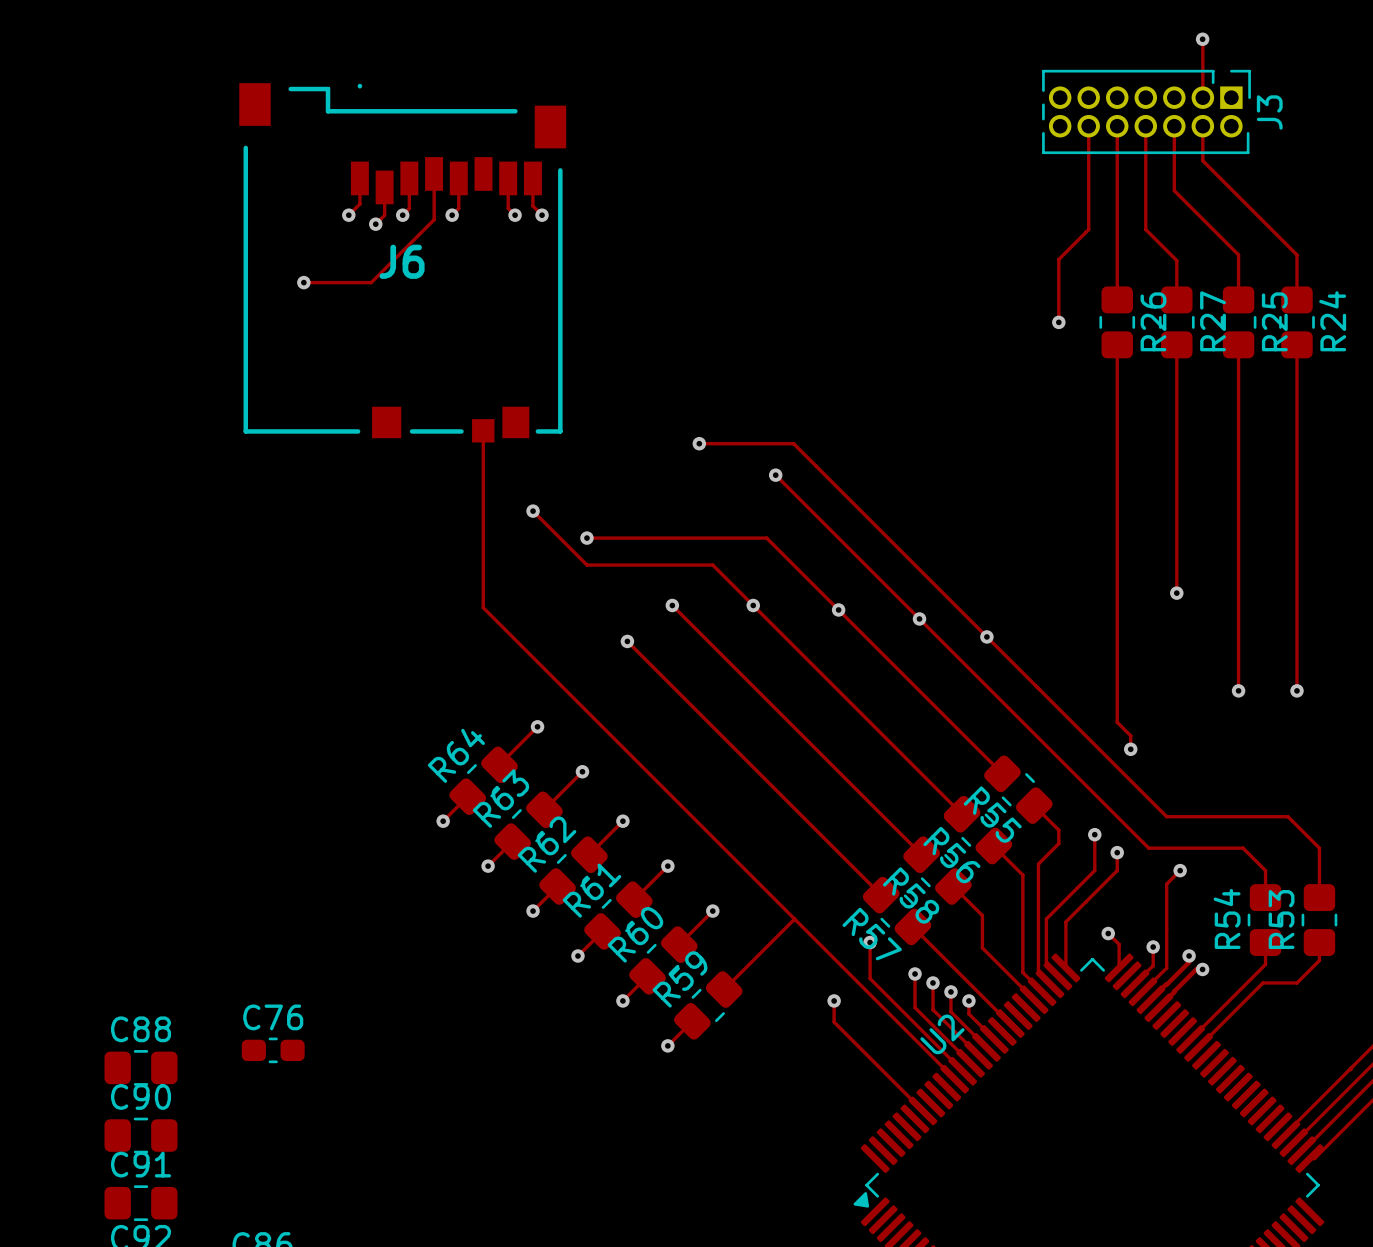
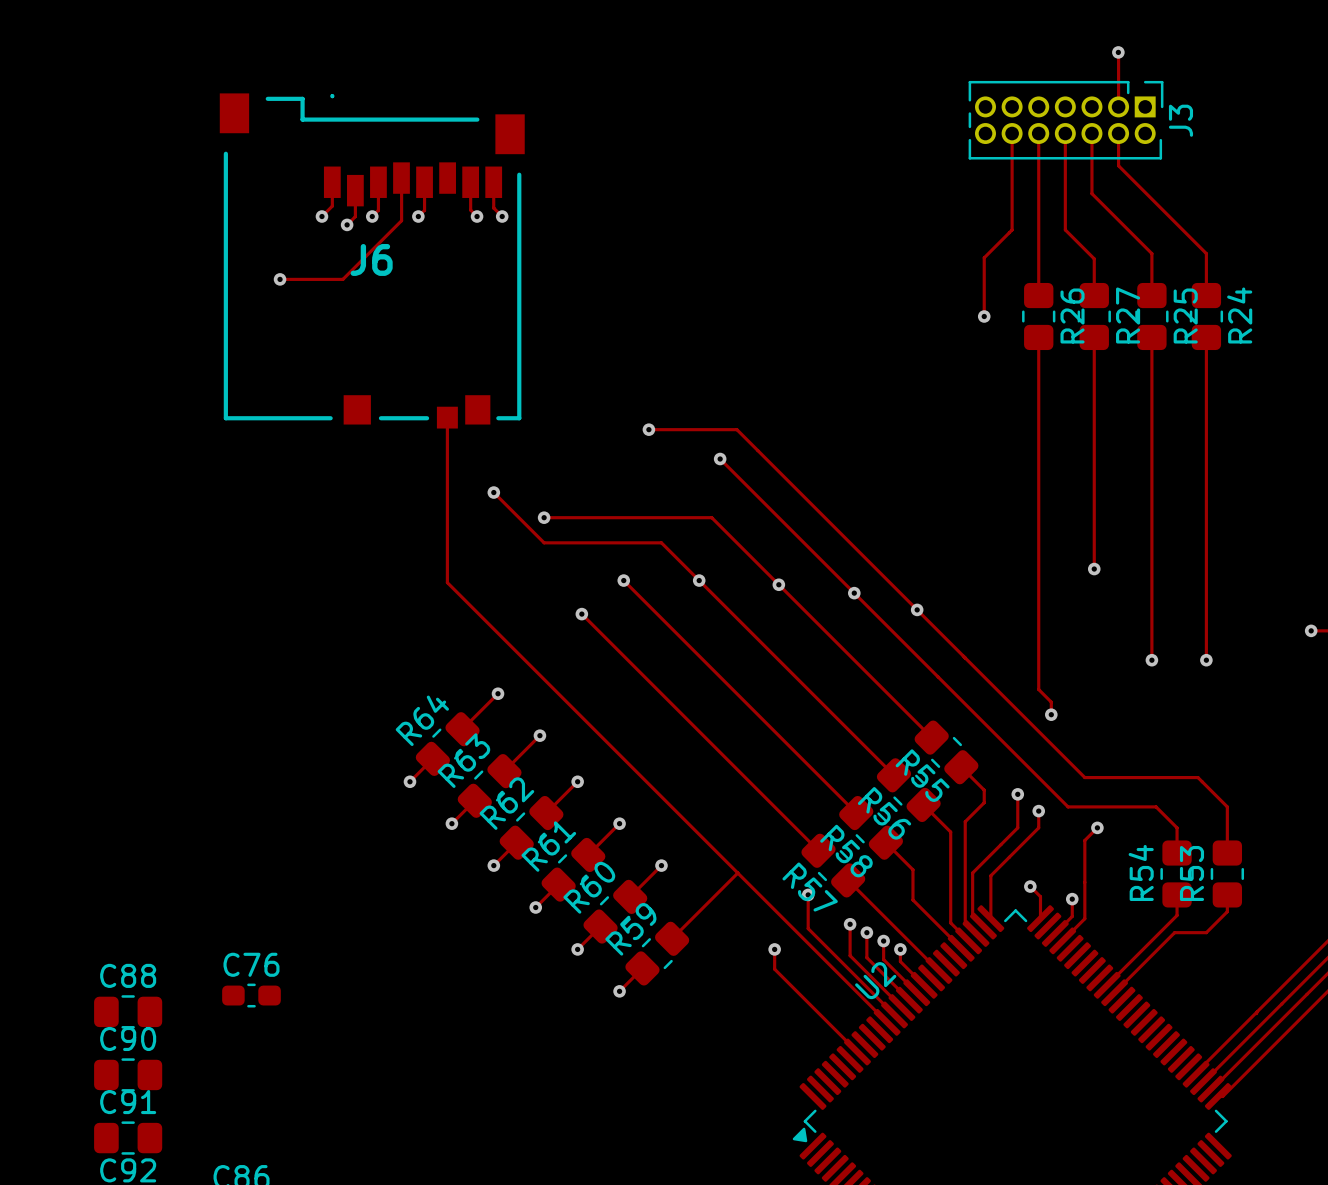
track: (1189, 955) (1189, 962) (1150, 999) -> none
via: (1189, 955) -> none
track: (1202, 969) (1196, 969) (1158, 1007) -> none
via: (1202, 969) -> none

